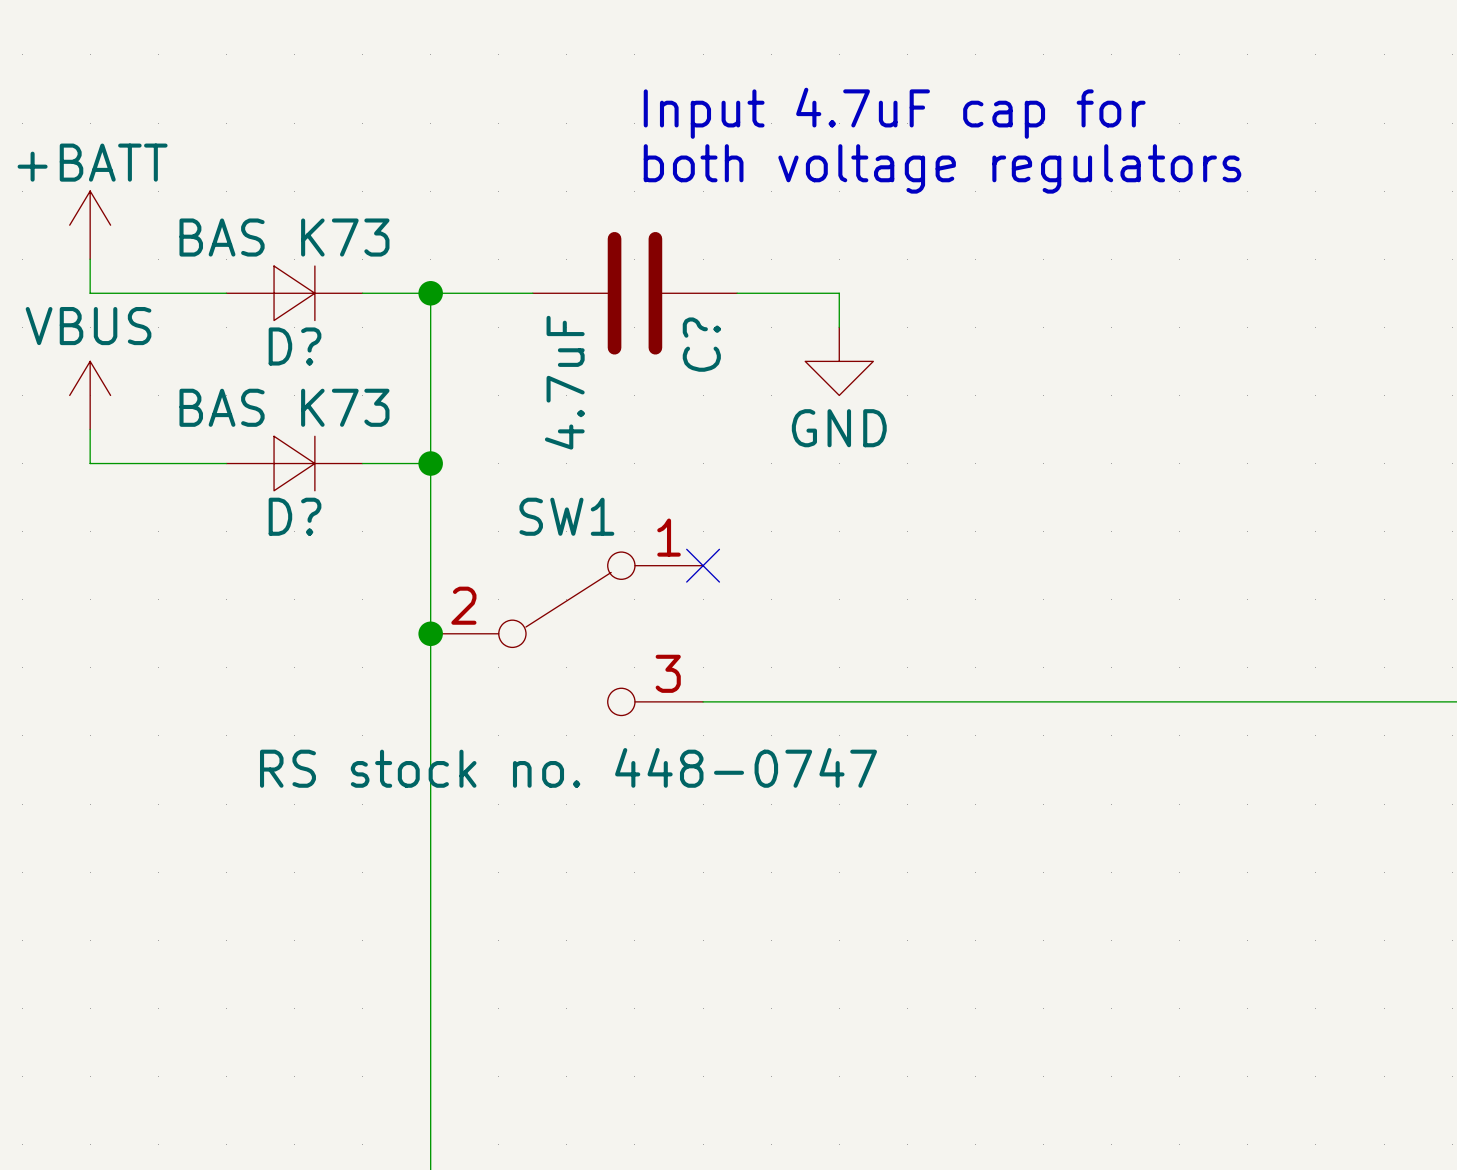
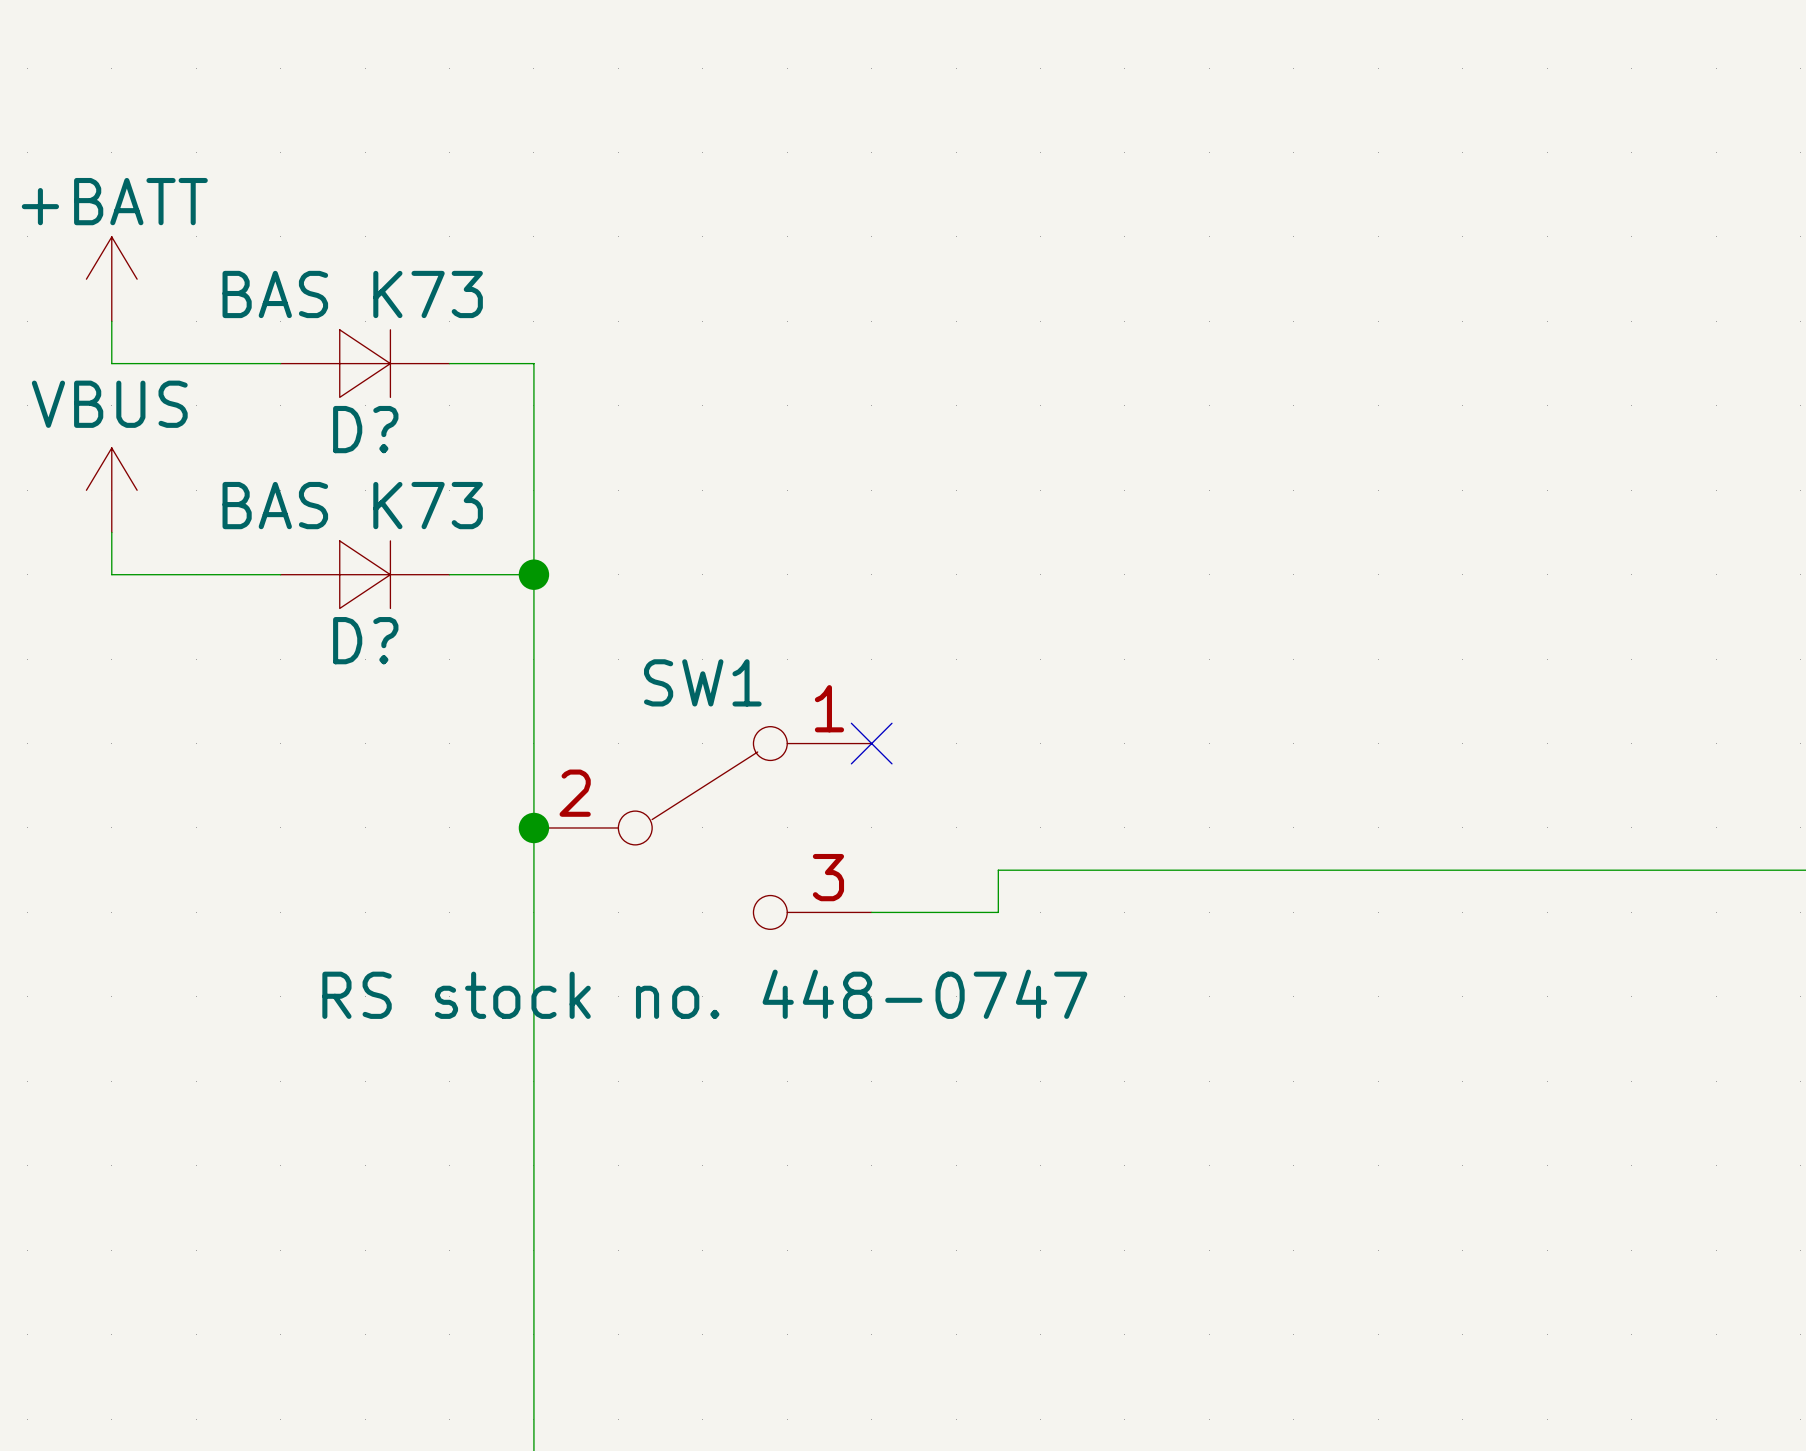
text: Input 4.7uF cap for (894, 113) -> none
text: both voltage regulators (942, 168) -> none
wire: (430, 293) (532, 293) -> none
junction: (430, 293) -> none
C?: 4.7uF (634, 293) -> none
wire: (737, 293) (839, 293) (839, 327) -> none
power symbol: GND (839, 361) -> none
no-connect mark position: (703, 565) -> (871, 743)
junction position: (430, 633) -> (533, 827)
SW1 position: (566, 633) -> (702, 827)
wire: (703, 701) (805, 701) -> (871, 912) (998, 912) (998, 870)

